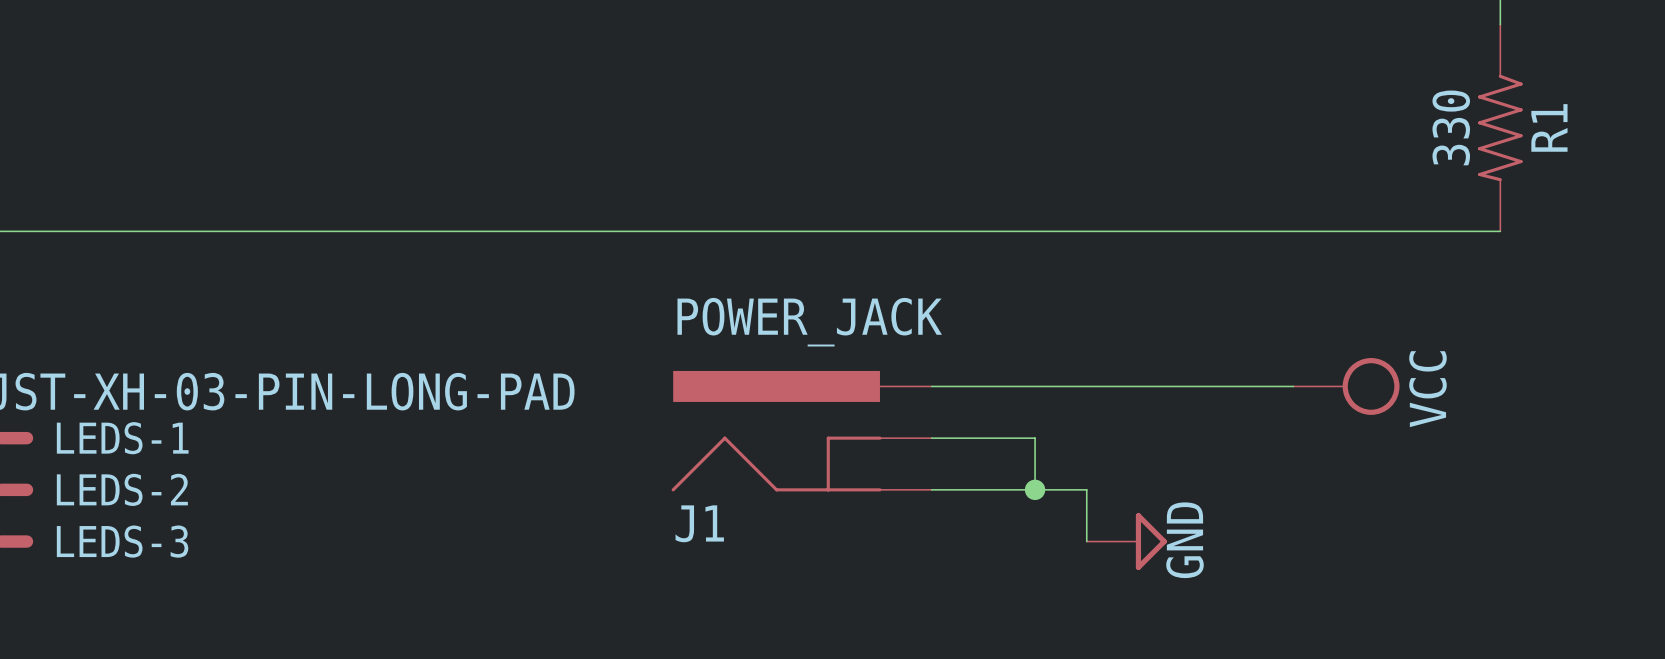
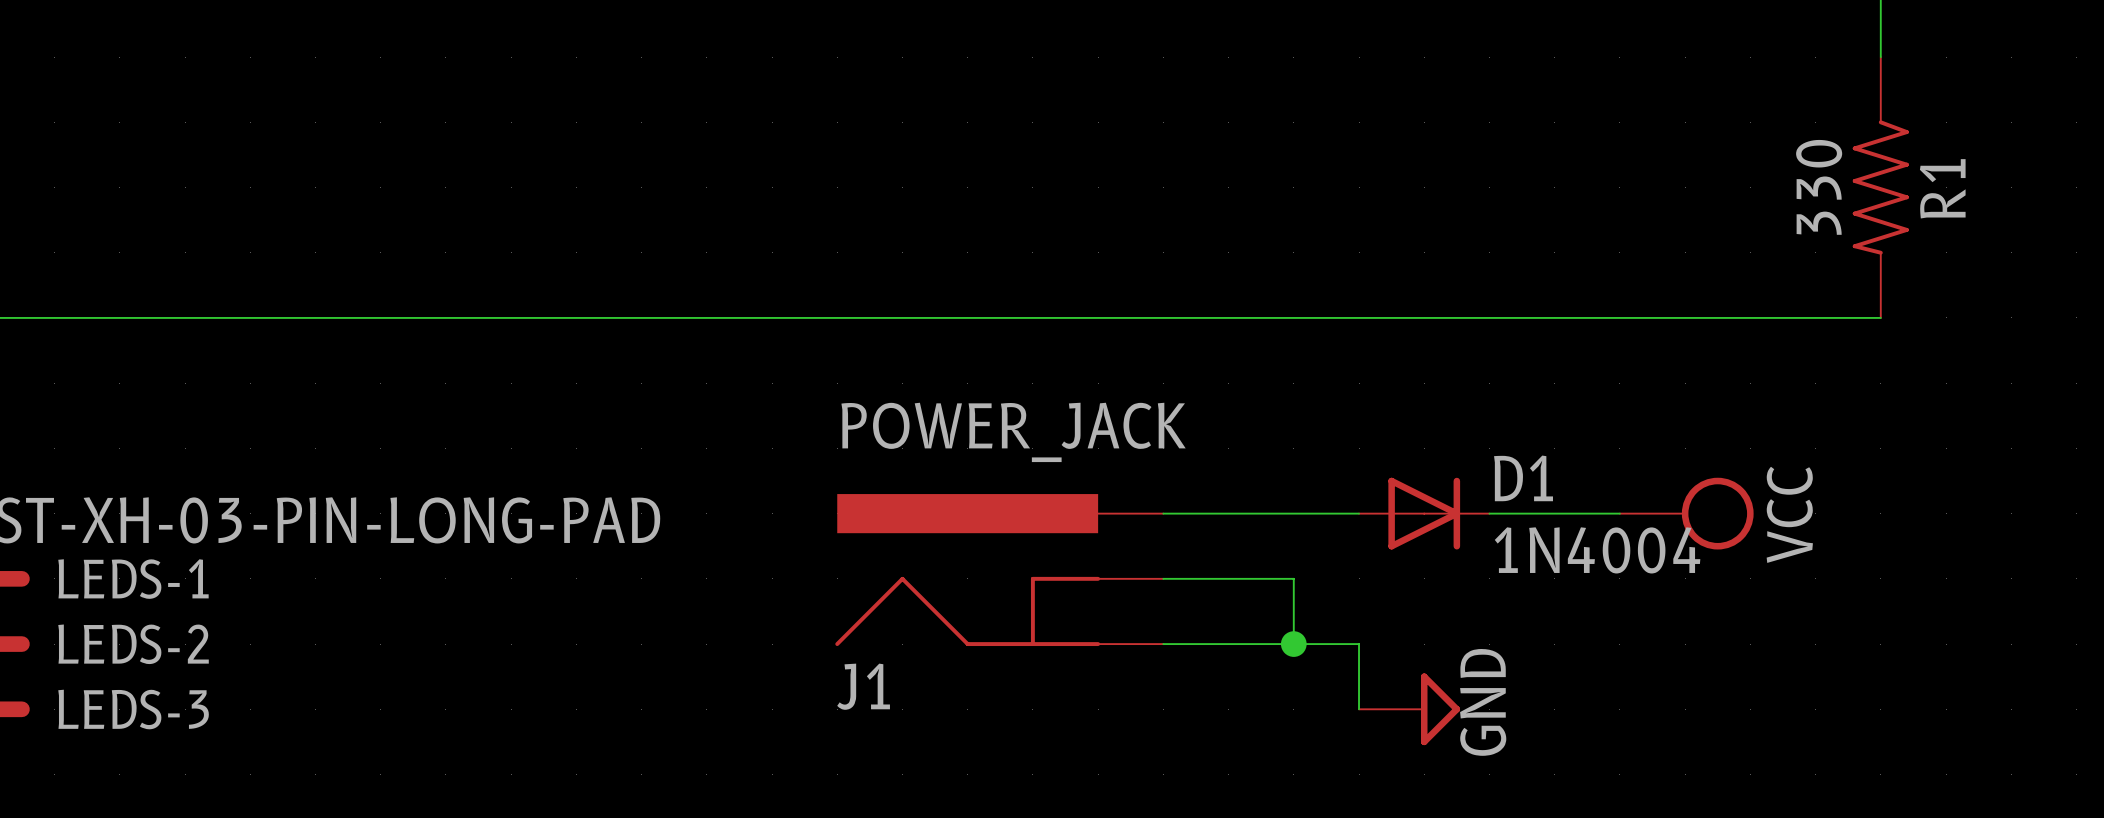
D1: none -> 1N4004 (1424, 513)

